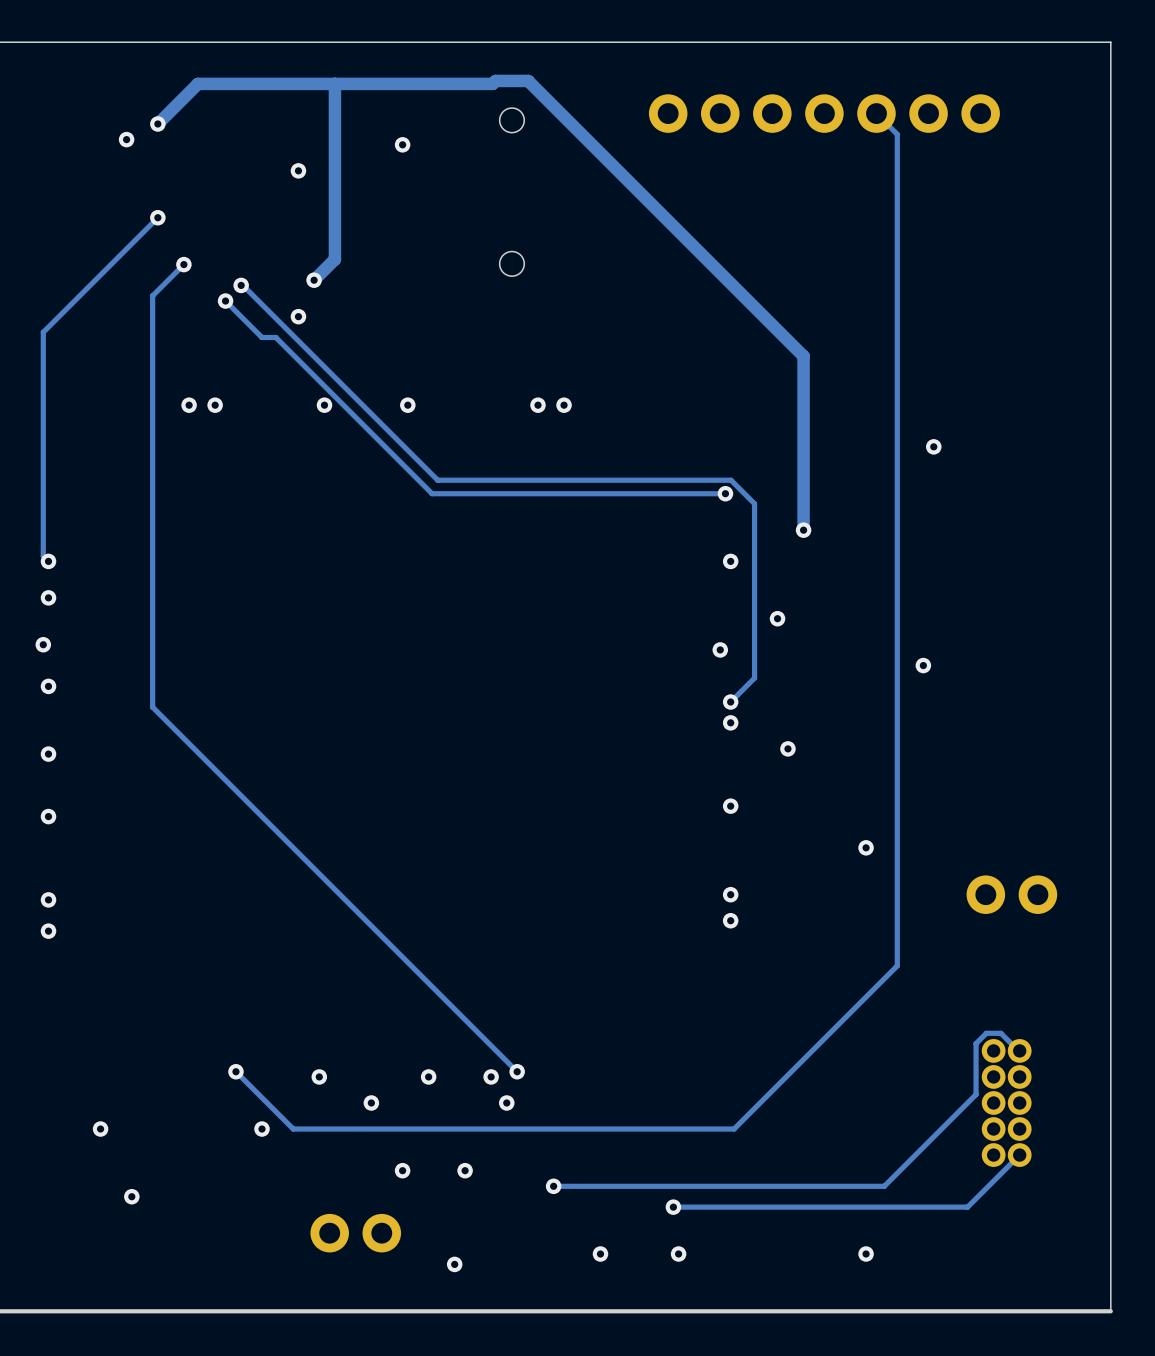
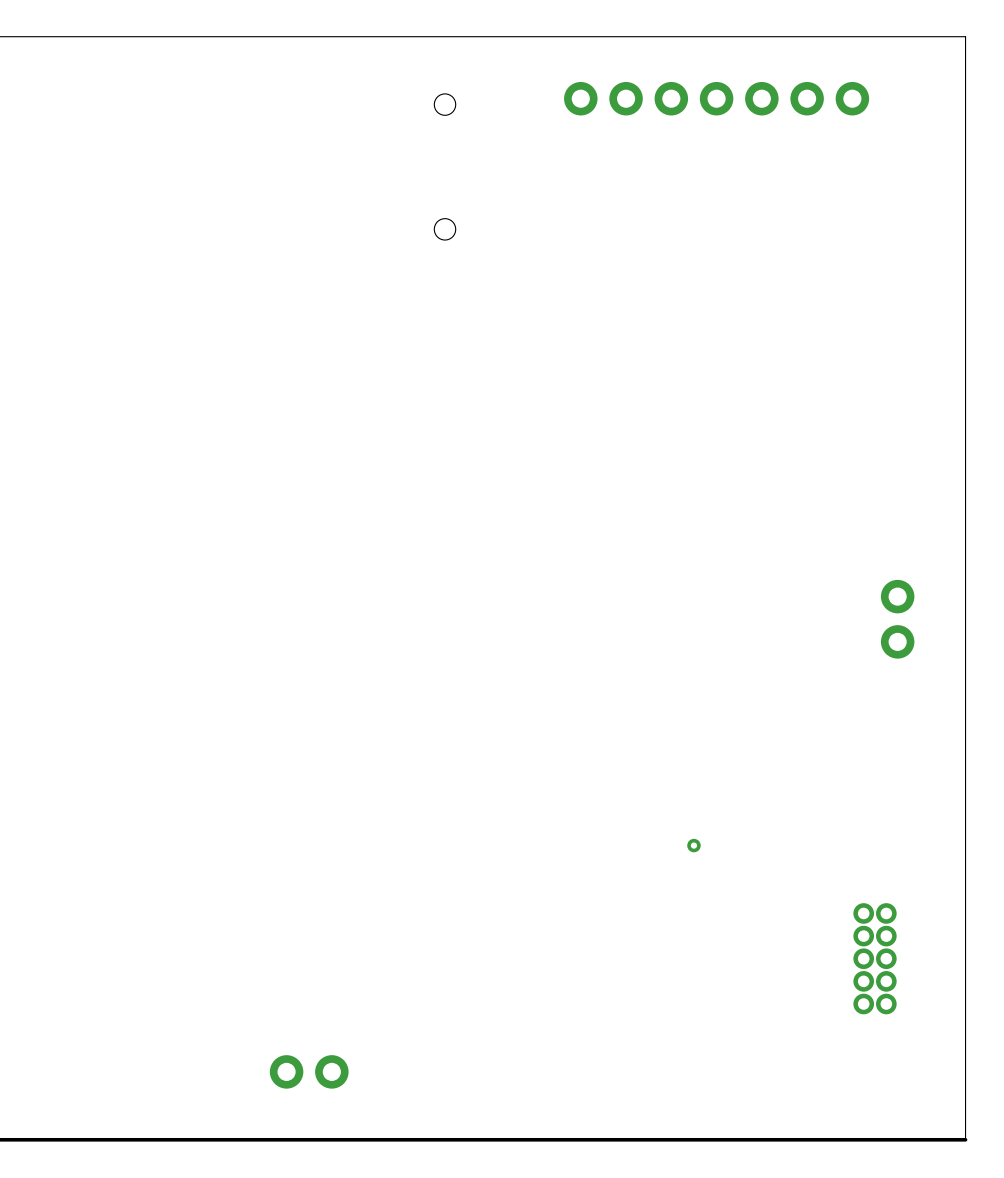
track: (334, 83) (334, 259) (314, 280) -> none
track: (876, 113) (897, 134) (897, 965) (734, 1129) (293, 1129) (235, 1071) -> none
track: (157, 123) (197, 83) (492, 83) (495, 80) (528, 80) (803, 356) (803, 530) -> none
via: (157, 123) -> none
via: (126, 139) -> none
via: (402, 144) -> none
via: (298, 170) -> none
track: (157, 217) (43, 332) (43, 556) (48, 561) -> none
via: (157, 217) -> none
track: (183, 264) (152, 295) (152, 707) (517, 1071) -> none
via: (183, 264) -> none
via: (314, 280) -> none
track: (241, 285) (437, 480) (731, 480) (754, 503) (754, 678) (730, 702) -> none
via: (241, 285) -> none
track: (225, 301) (262, 337) (275, 337) (432, 493) (725, 493) -> none
via: (225, 301) -> none
via: (298, 316) -> none
via: (189, 405) -> none
via: (215, 405) -> none
via: (324, 405) -> none
via: (407, 405) -> none
via: (538, 405) -> none
via: (564, 405) -> none
via: (933, 446) -> none
via: (725, 493) -> none
via: (803, 530) -> none
via: (48, 561) -> none
via: (730, 561) -> none
via: (48, 597) -> none
via: (777, 618) -> none
via: (43, 644) -> none
via: (720, 649) -> none
via: (923, 665) -> none
via: (48, 686) -> none
via: (730, 702) -> none
via: (730, 722) -> none
via: (787, 748) -> none
via: (48, 754) -> none
via: (730, 806) -> none
via: (48, 816) -> none
via: (866, 847) -> none
via: (730, 894) -> none
part rotation: 0° (1011, 894) -> 90° clockwise (897, 619)
part position: (1011, 894) -> (897, 619)
via: (48, 899) -> none
via: (730, 920) -> none
via: (48, 931) -> none
via: none -> (693, 845)
track: (1019, 1050) (1000, 1033) (986, 1033) (976, 1043) (976, 1094) (884, 1186) (553, 1186) -> none
via: (235, 1071) -> none
via: (517, 1071) -> none
via: (319, 1076) -> none
via: (428, 1076) -> none
via: (491, 1076) -> none
via: (371, 1102) -> none
via: (506, 1102) -> none
via: (100, 1129) -> none
via: (262, 1129) -> none
track: (1019, 1155) (967, 1207) (673, 1207) -> none
via: (402, 1170) -> none
via: (465, 1170) -> none
via: (553, 1186) -> none
via: (131, 1196) -> none
via: (673, 1207) -> none
via: (600, 1254) -> none
via: (678, 1254) -> none
via: (866, 1254) -> none
via: (454, 1264) -> none

